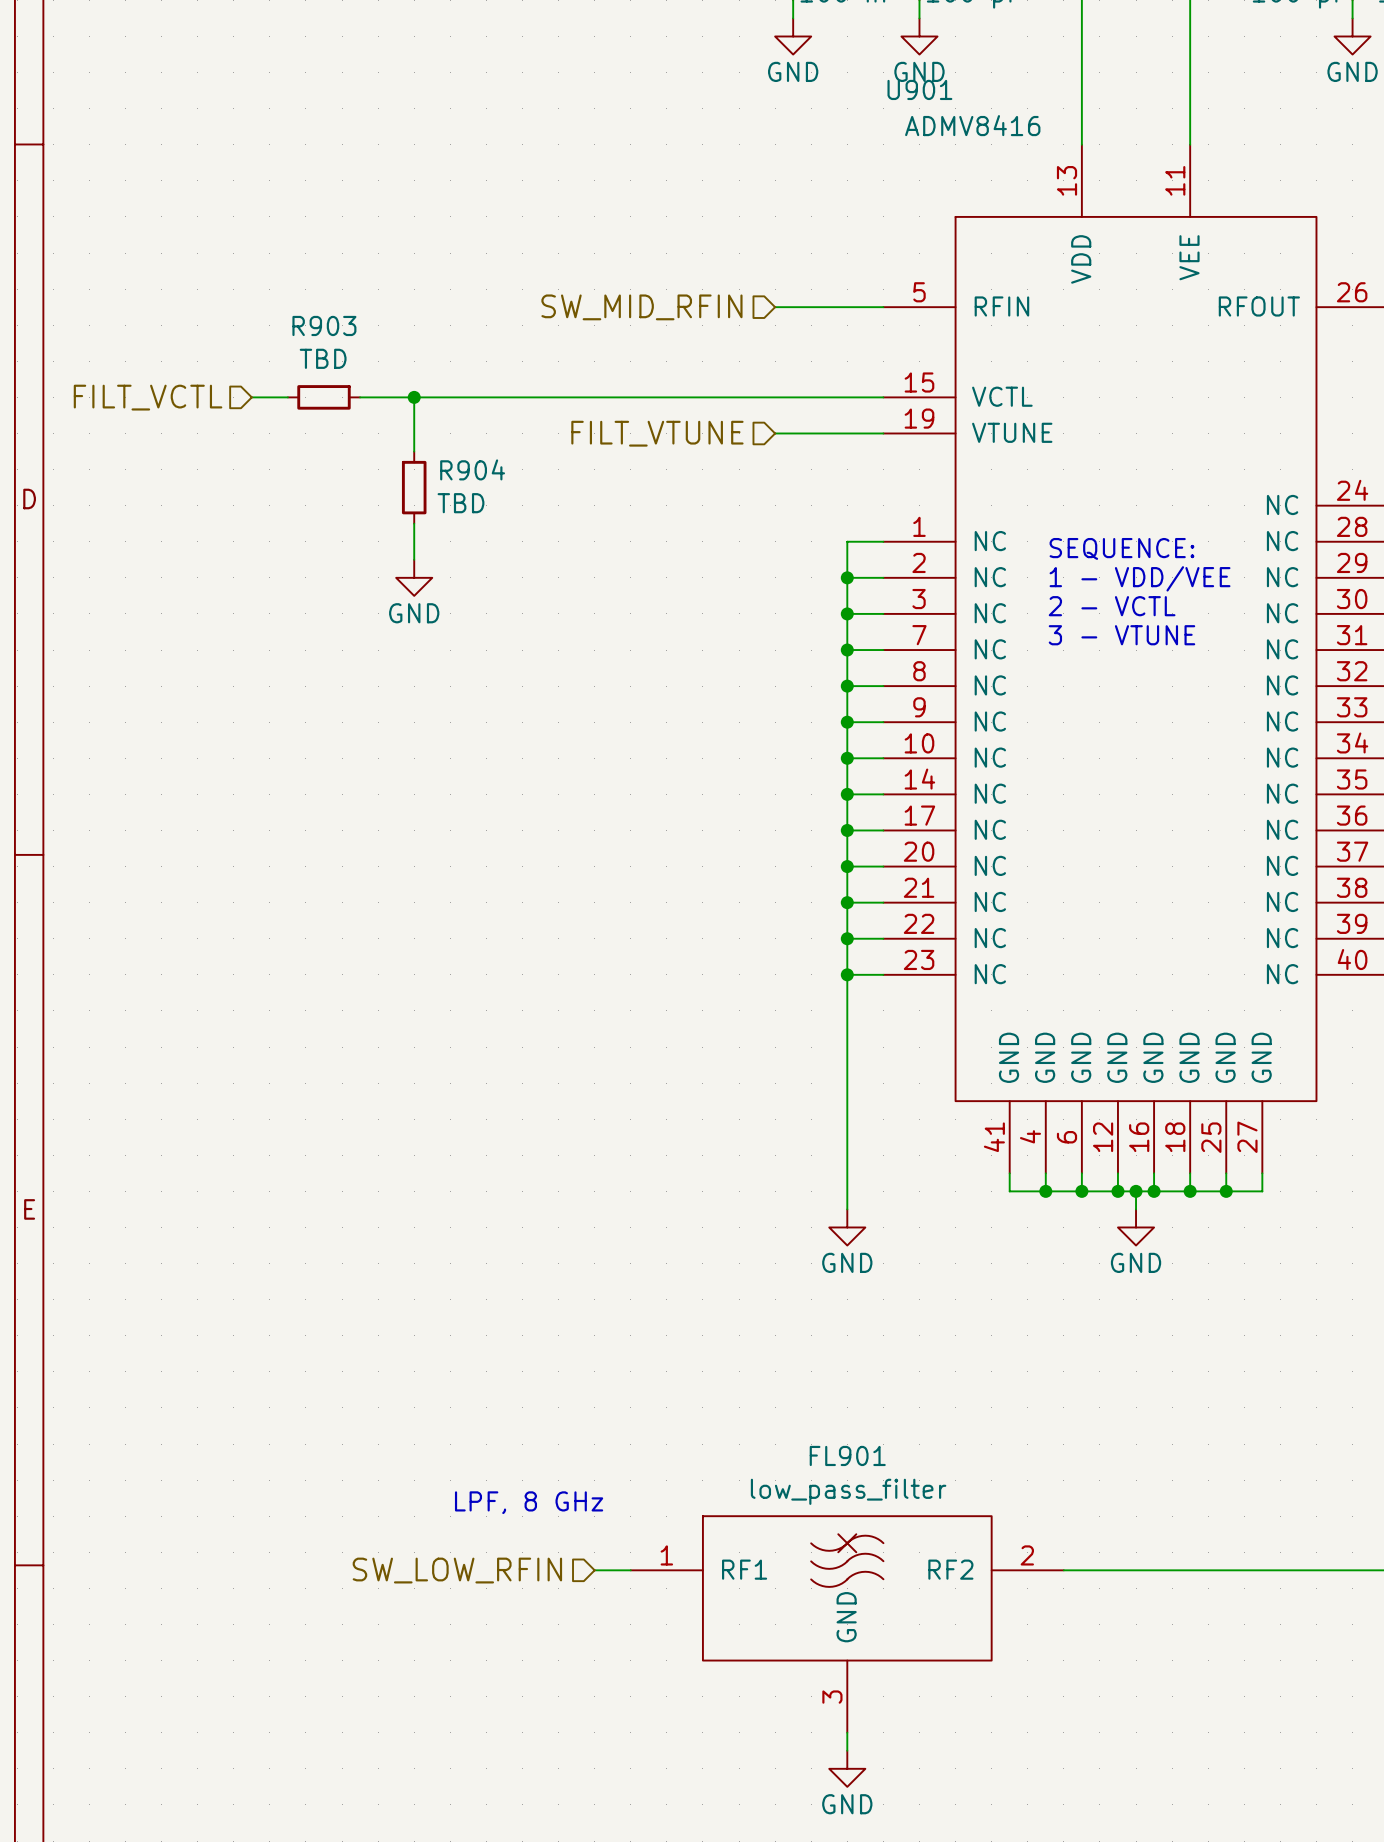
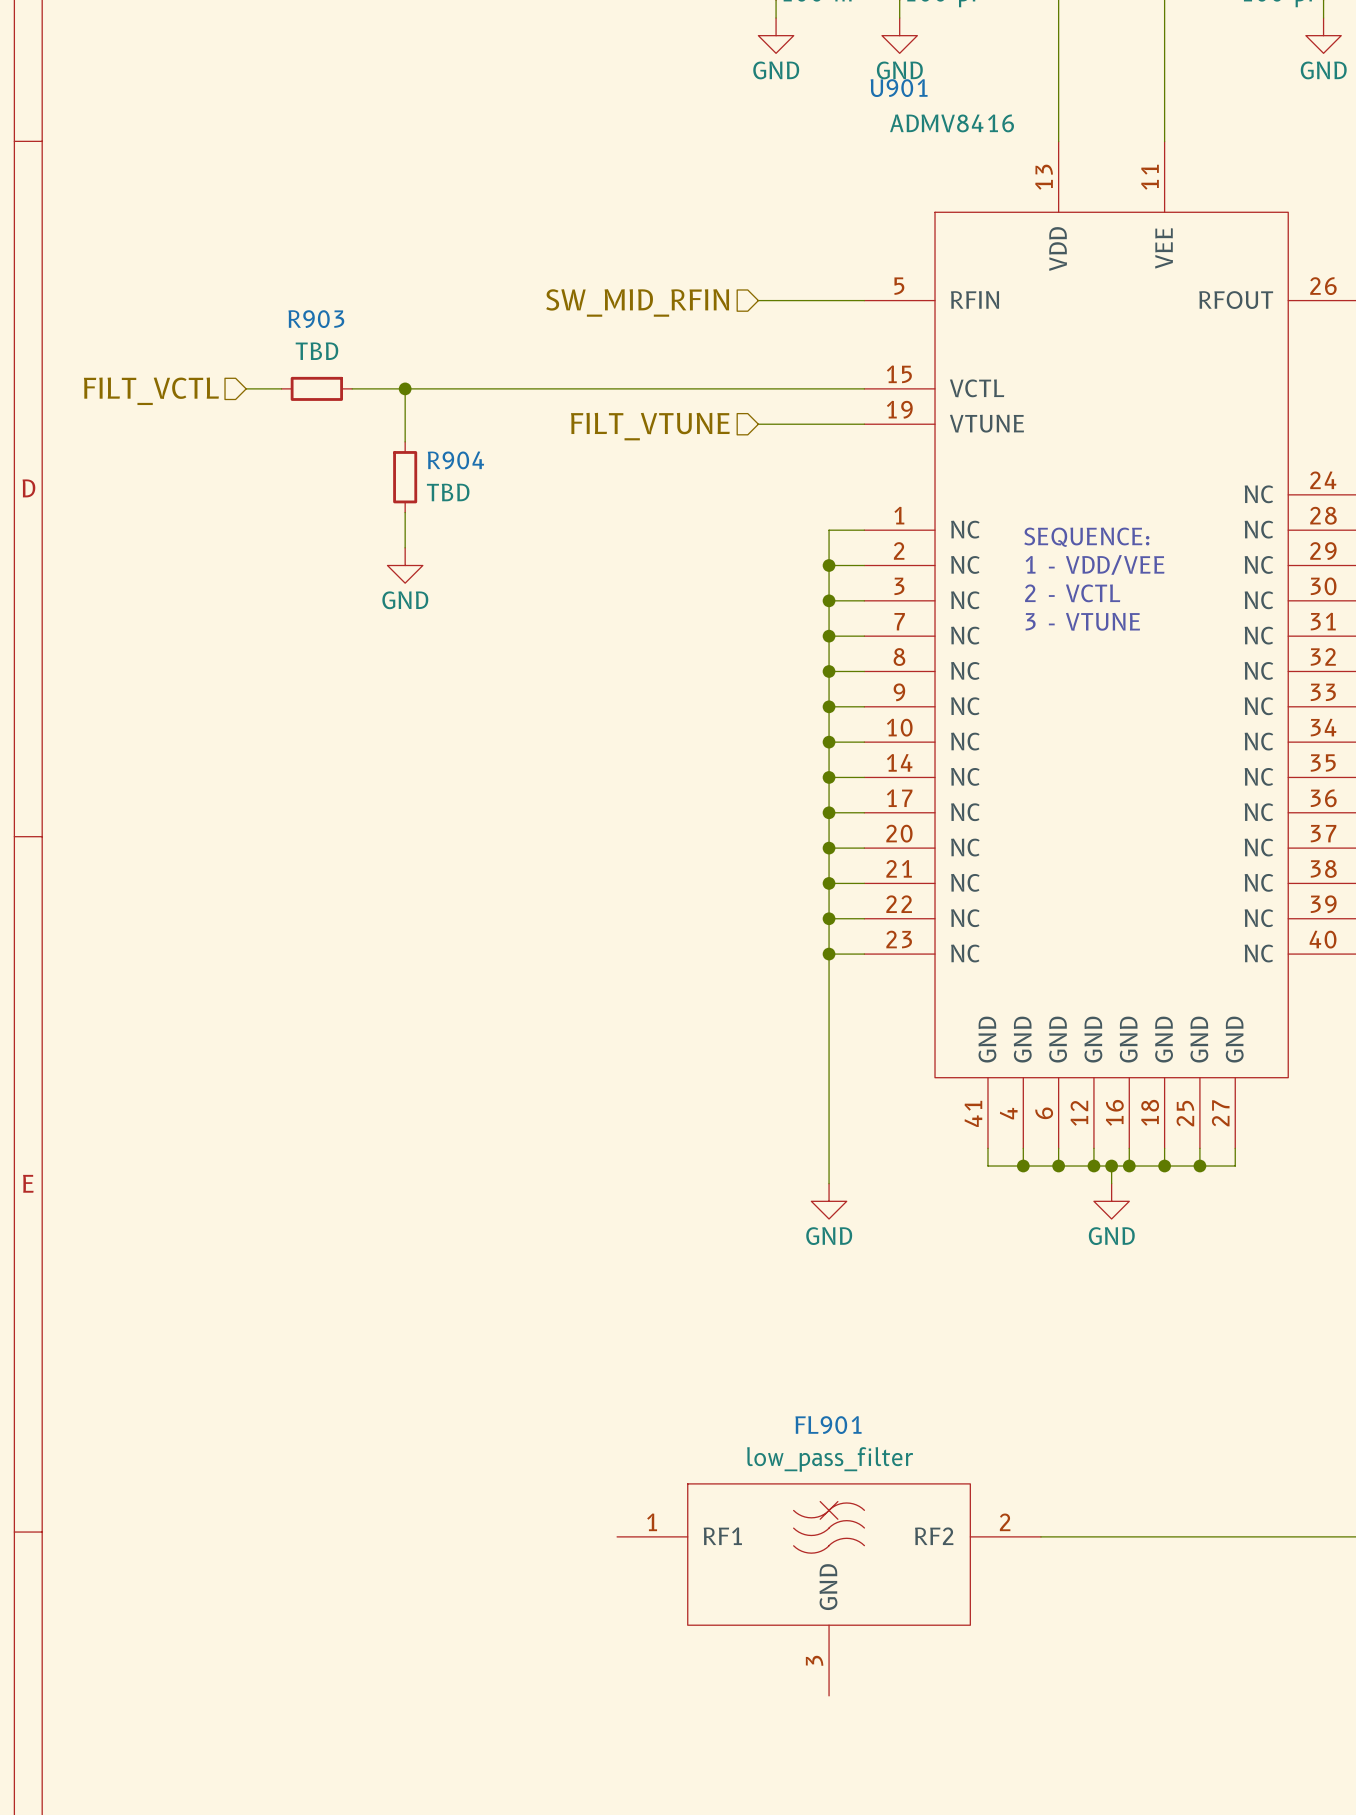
text: LPF, 8 GHz (529, 1502) -> none
hierarchical label: SW_LOW_RFIN (457, 1570) -> none
wire: (594, 1570) (630, 1570) -> none
wire: (847, 1732) (847, 1750) -> none
power symbol: GND (847, 1768) -> none

